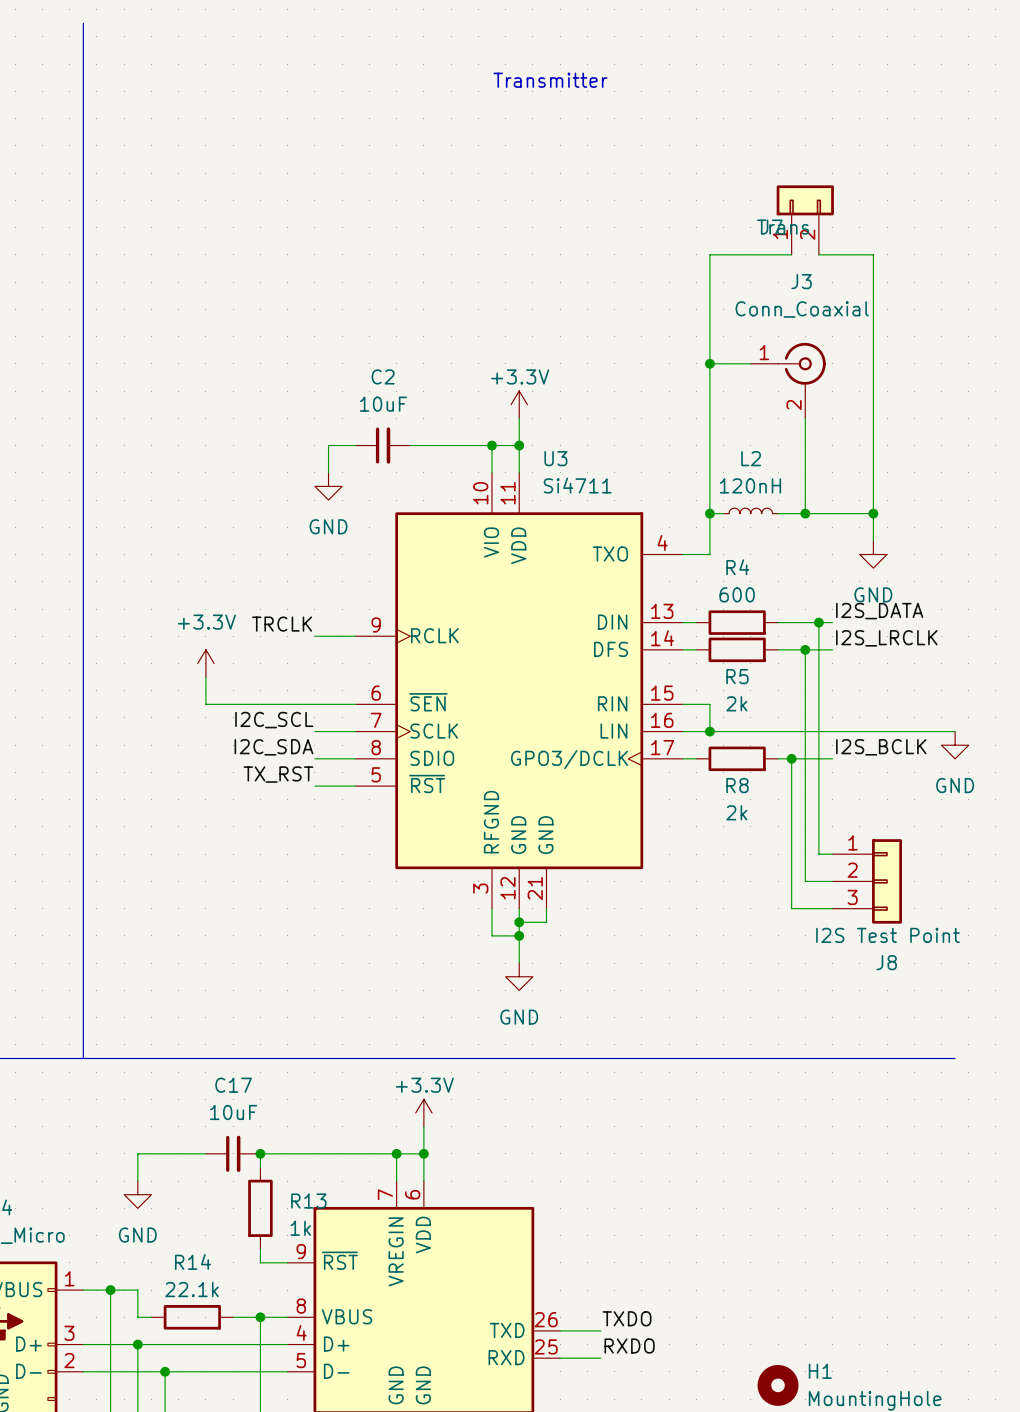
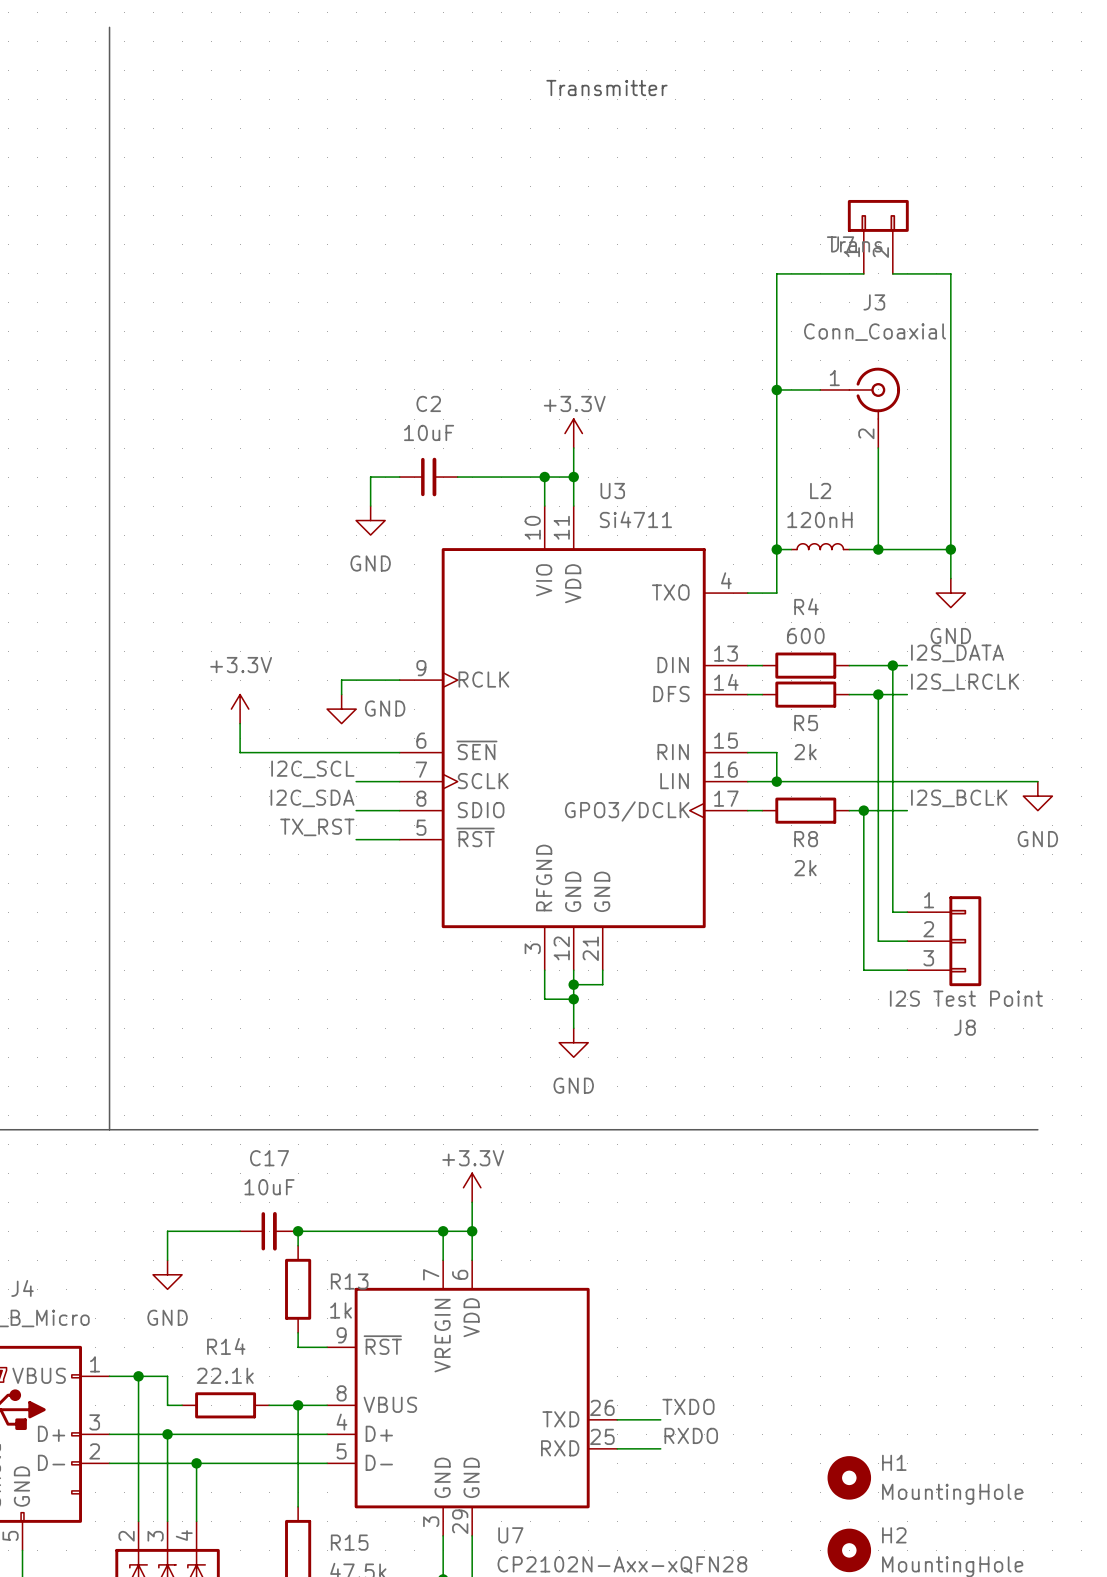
label: TRCLK (282, 624) -> none
wire: none -> (356, 680) (341, 680) (341, 694)
power symbol: none -> GND (341, 709)

